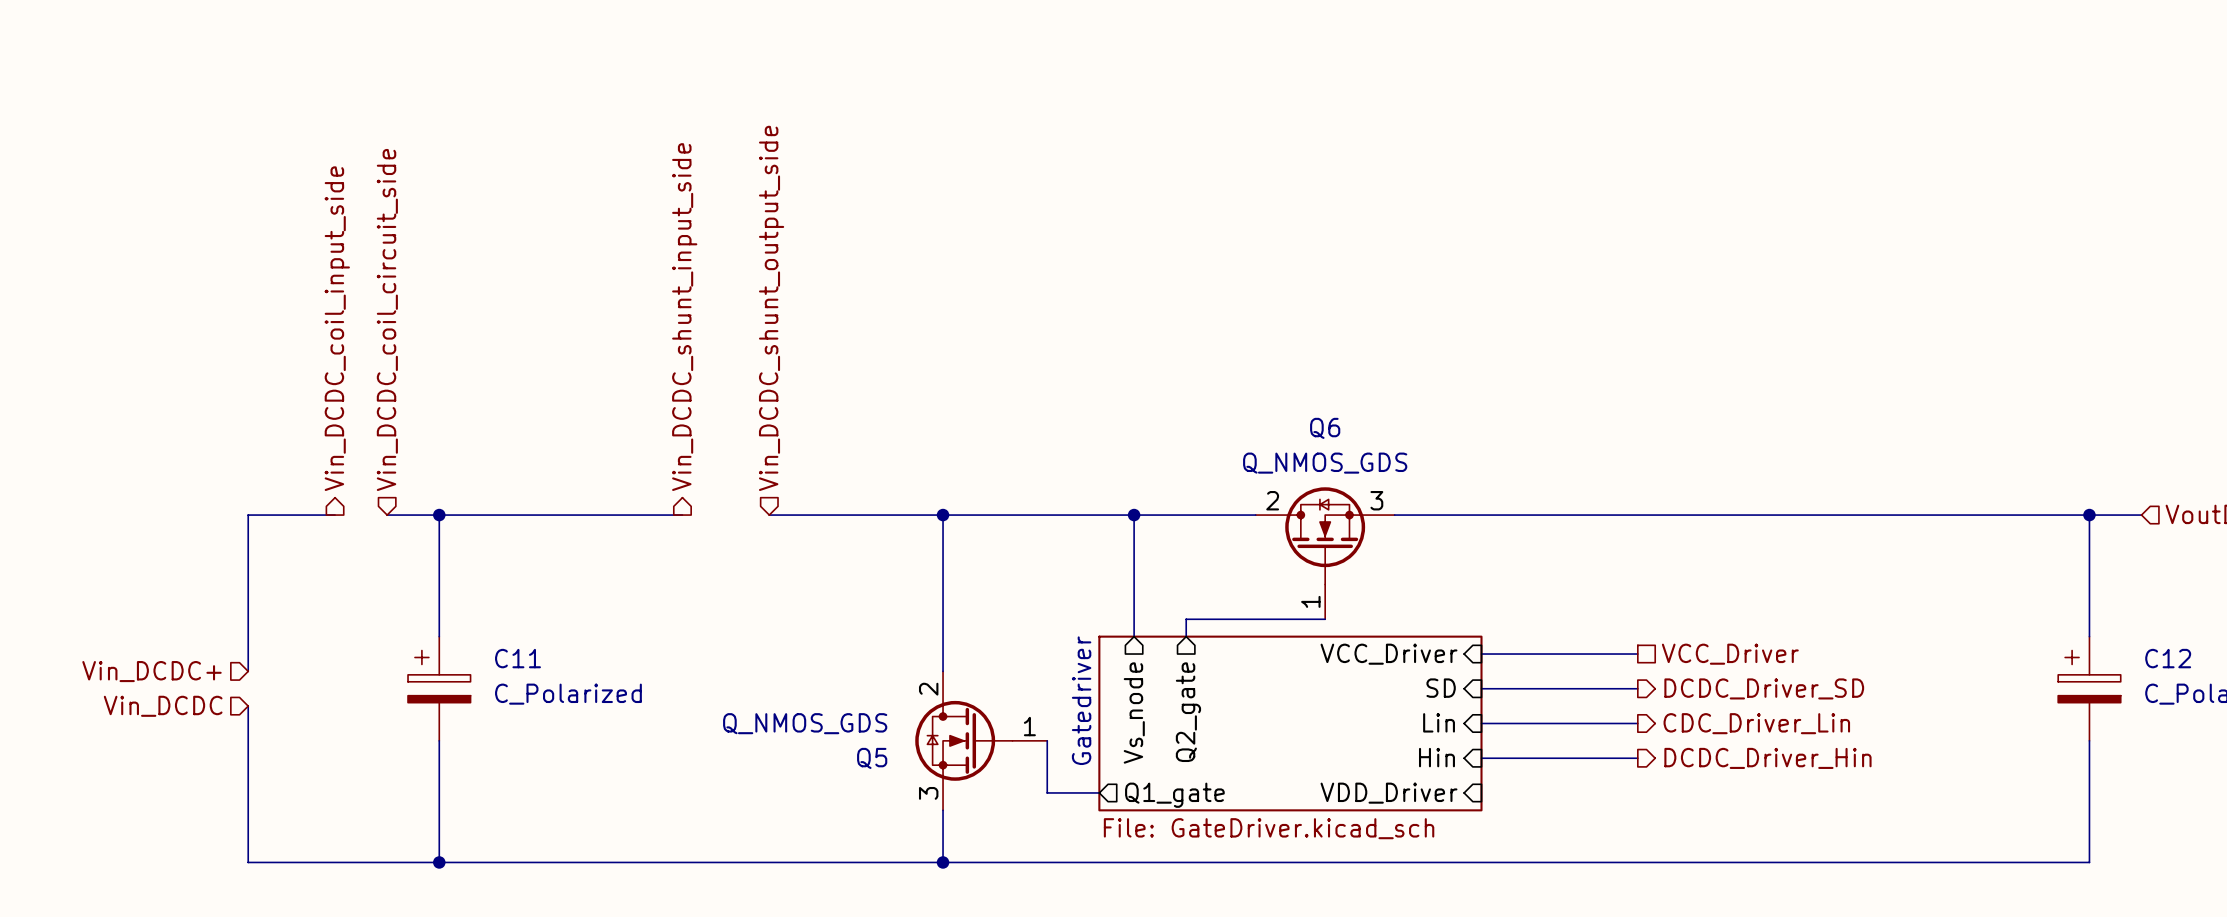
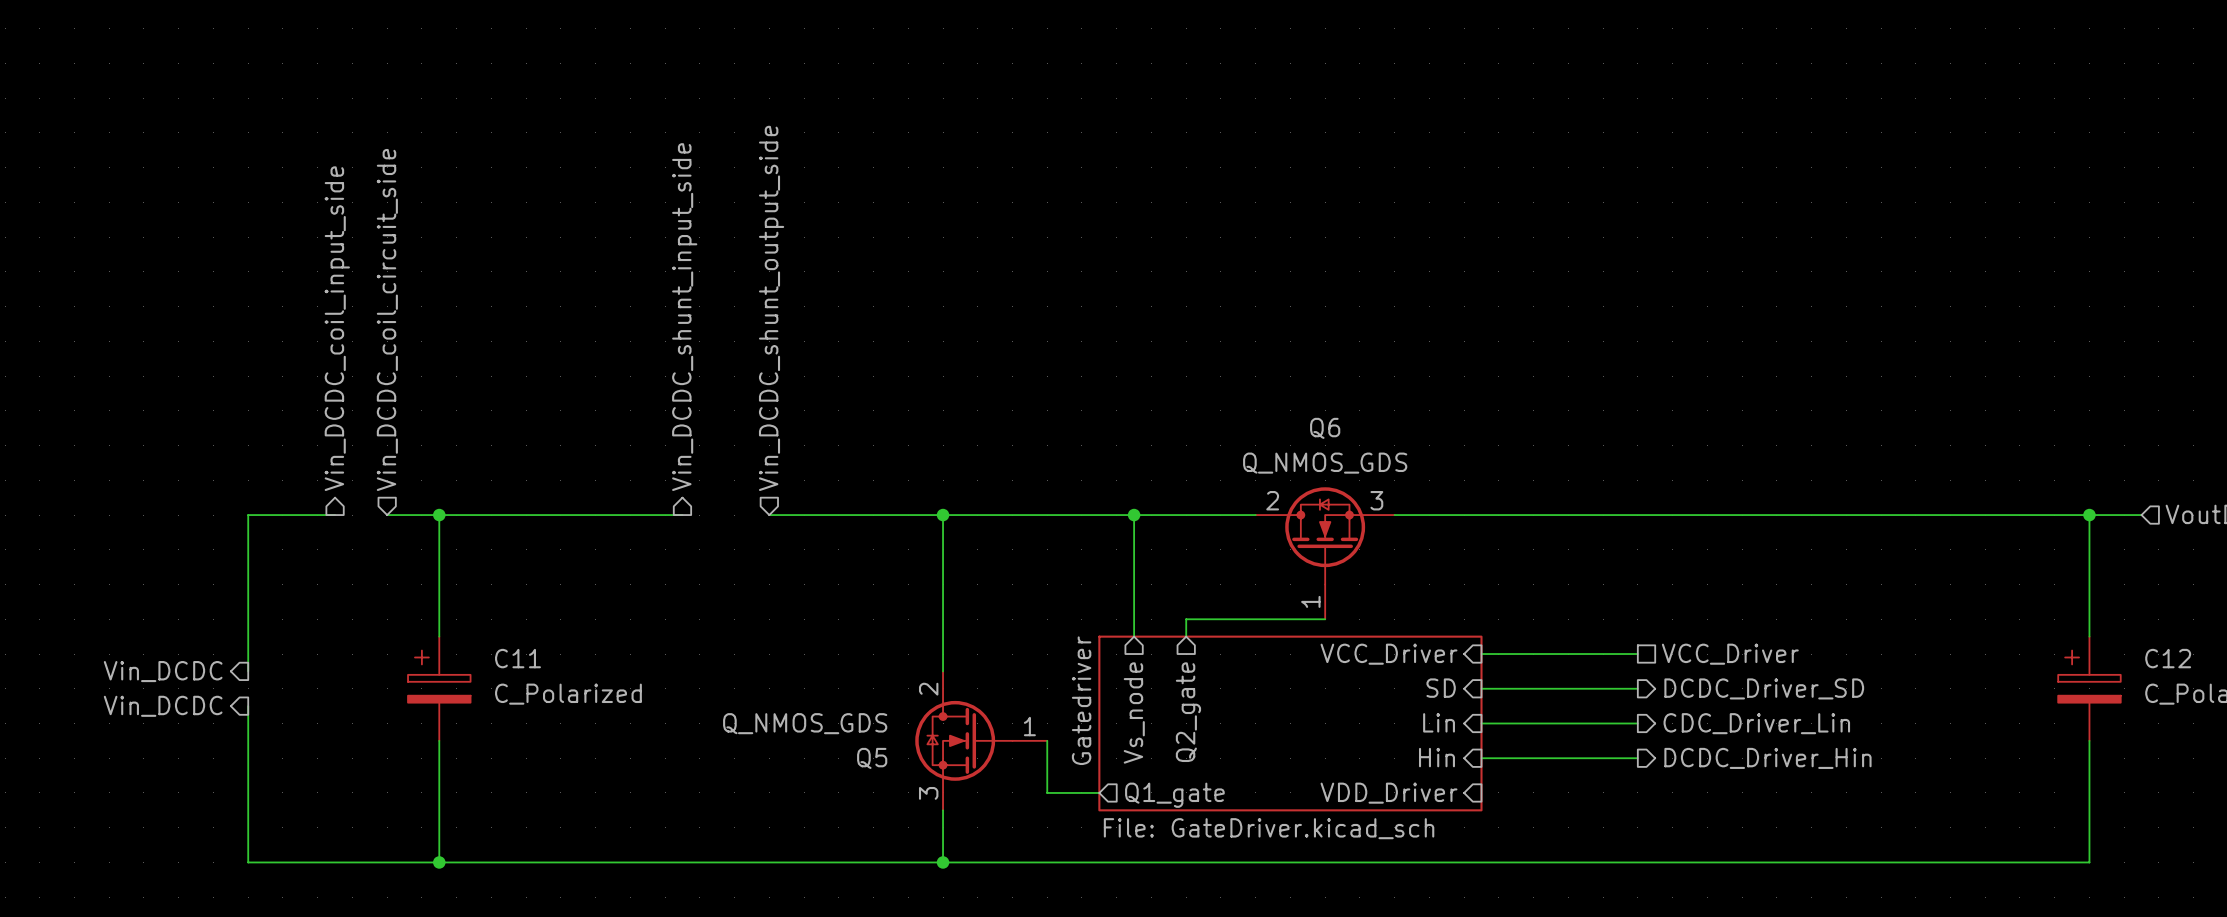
hierarchical label shape: input (151, 671) -> output (163, 671)
hierarchical label: Vin_DCDC+ (151, 671) -> Vin_DCDC (163, 671)
hierarchical label shape: input (163, 706) -> output (163, 706)

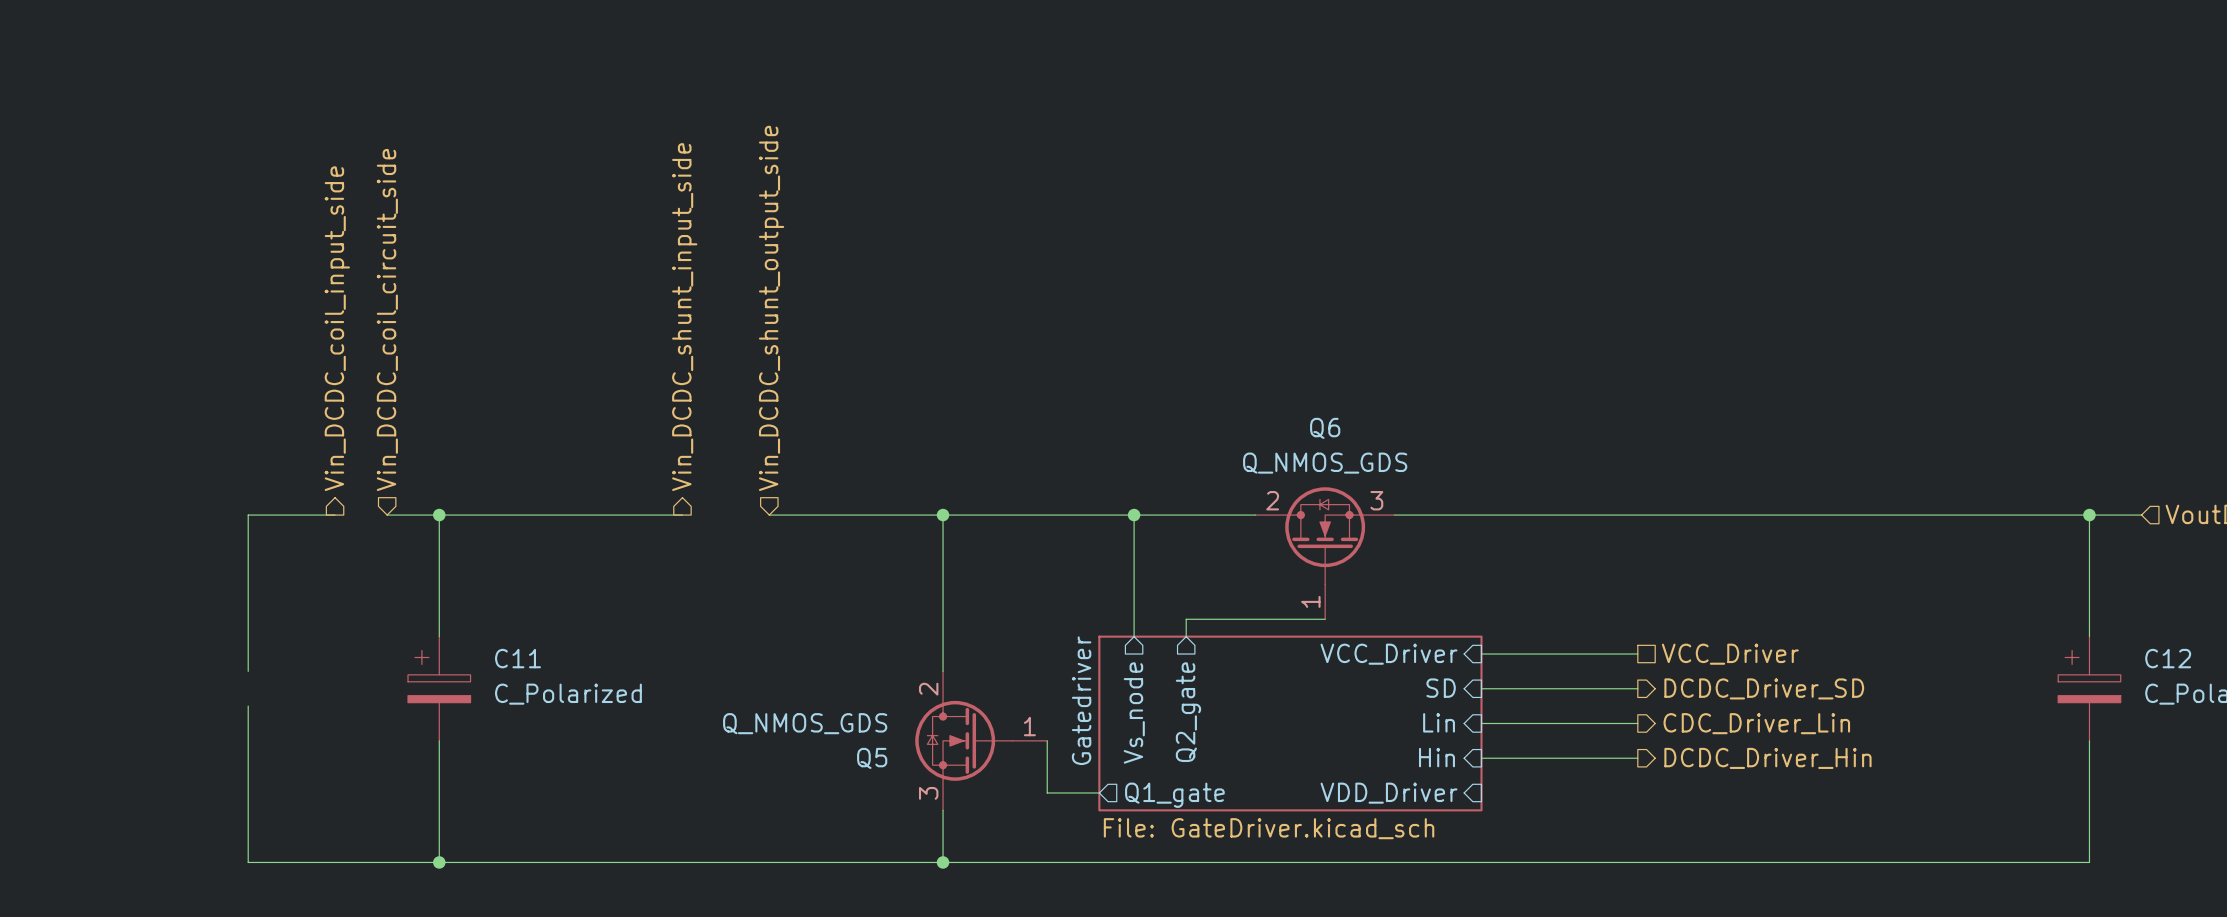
hierarchical label: Vin_DCDC (163, 671) -> none
hierarchical label: Vin_DCDC (163, 706) -> none

